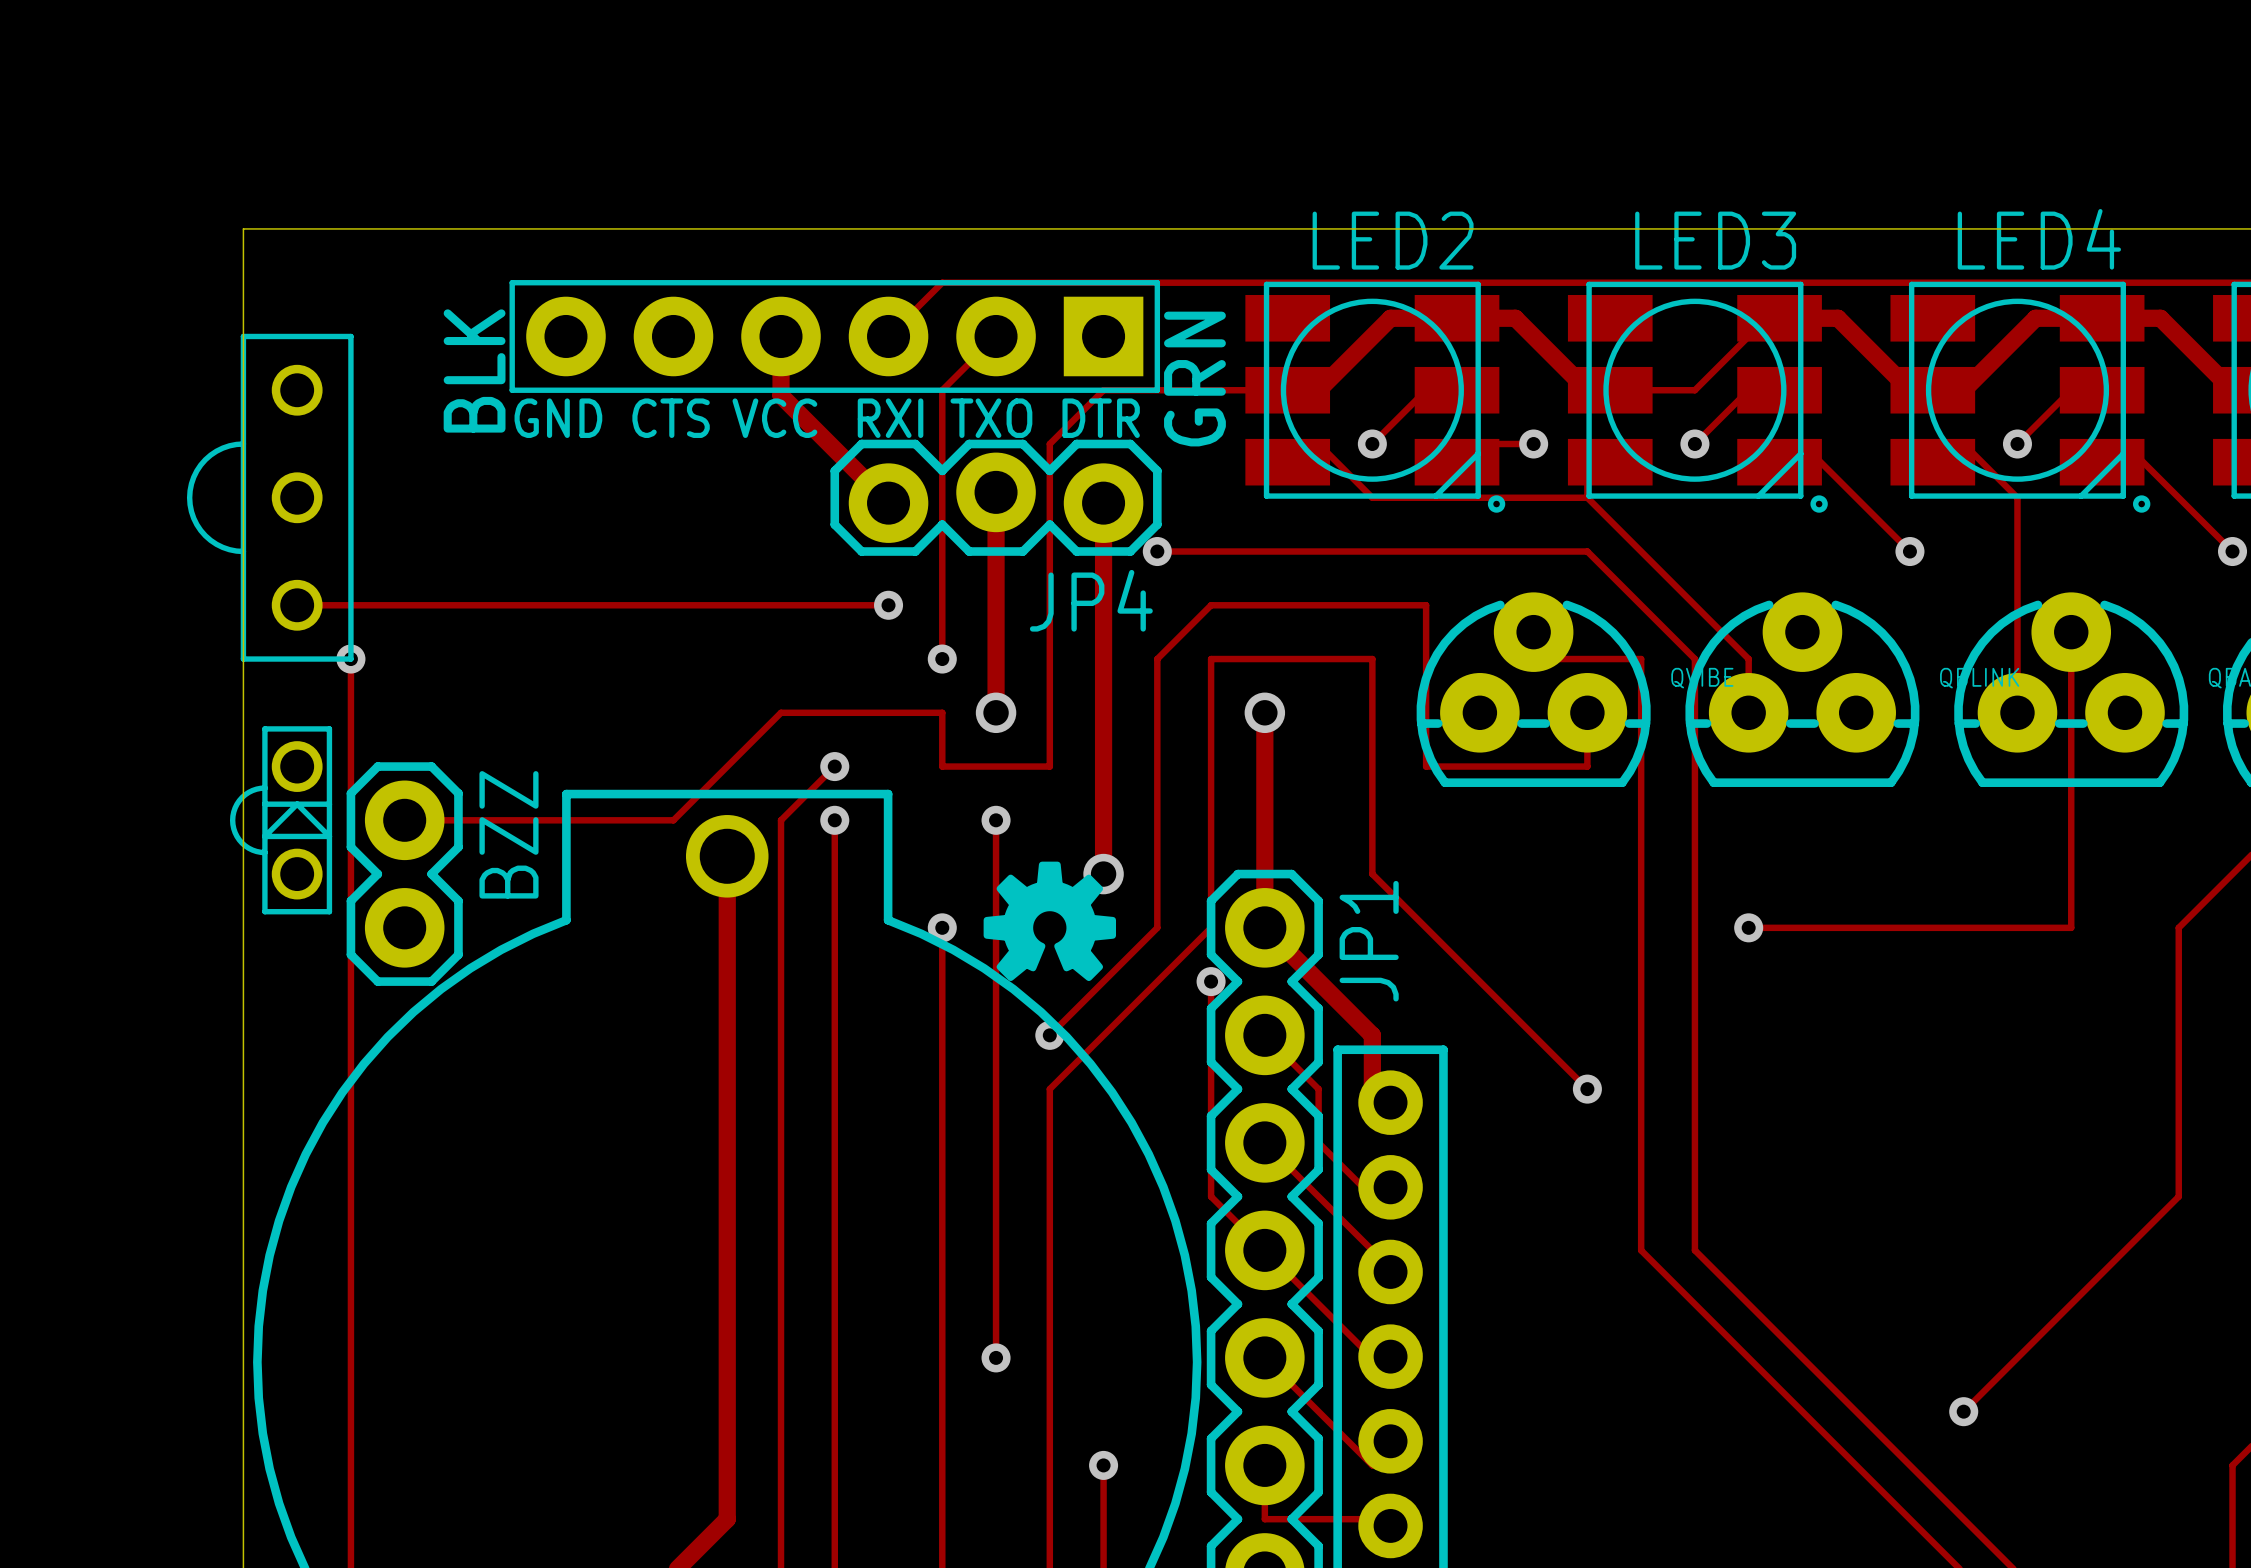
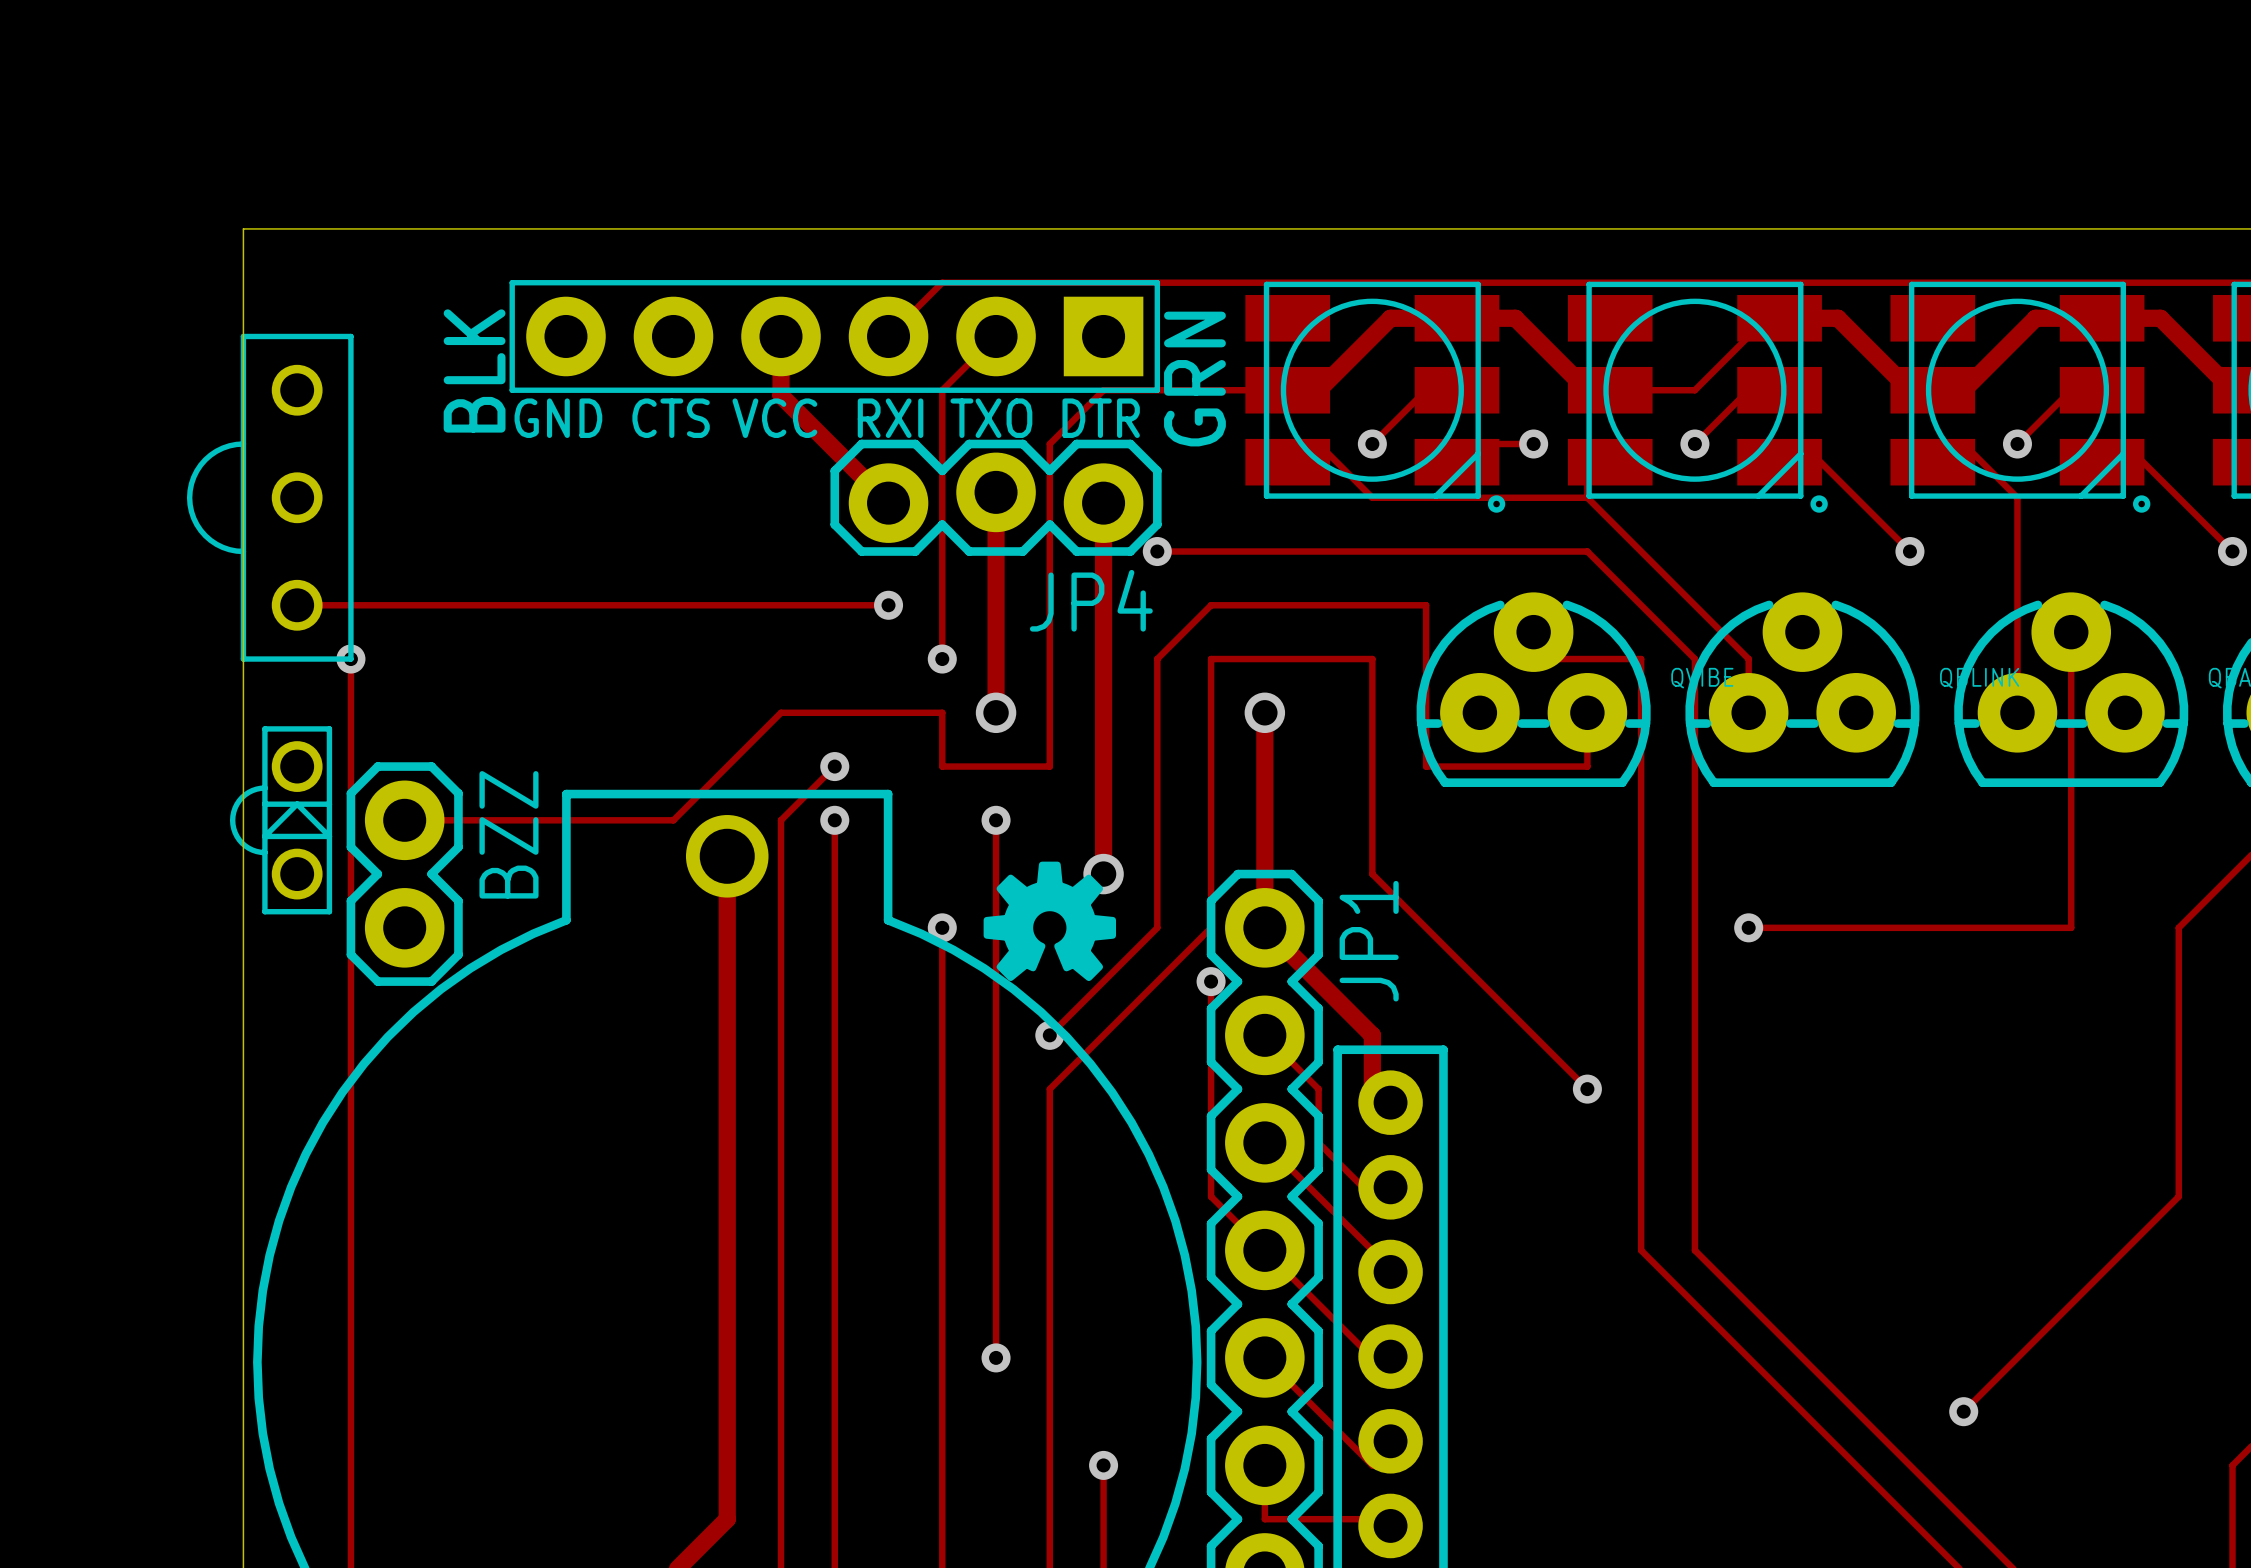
LED4 name: LED4 (2039, 239) -> none
LED2 name: LED2 (1393, 240) -> none
LED3 name: LED3 (1715, 240) -> none

